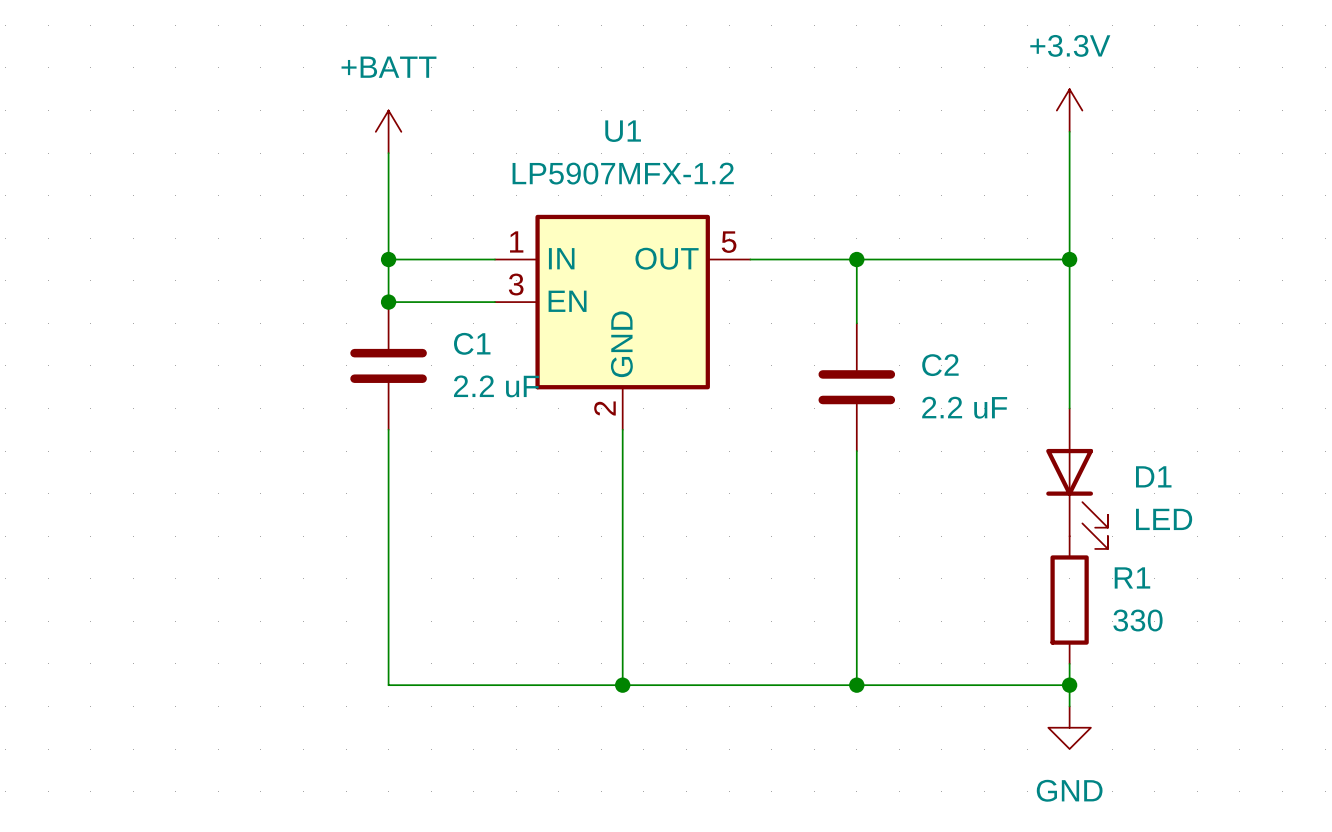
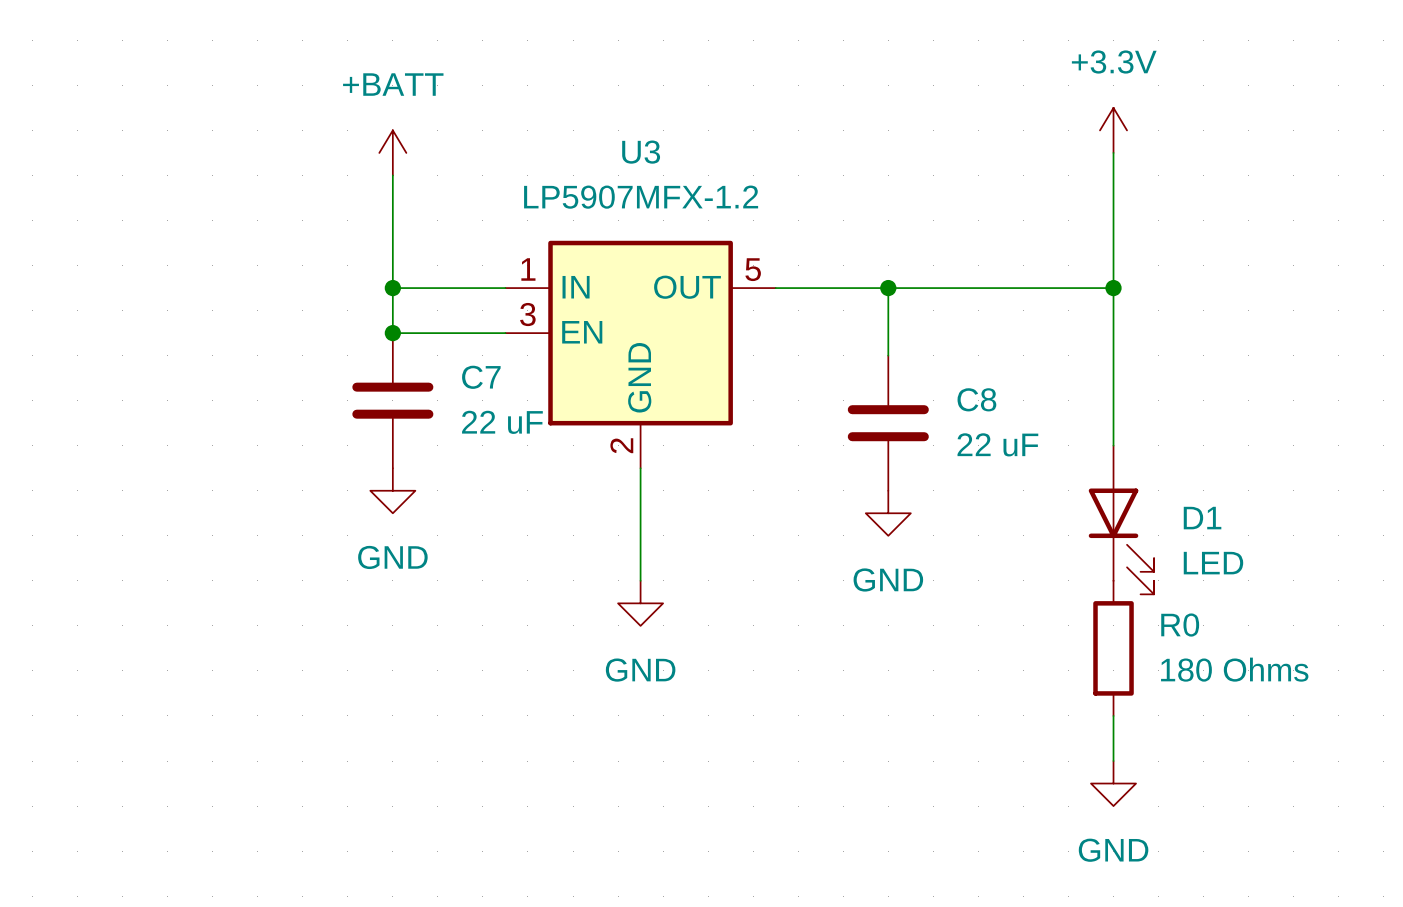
U1 name: U1 (623, 131) -> U3 (641, 152)
C1 name: C1 (472, 343) -> C7 (481, 377)
C2 name: C2 (940, 365) -> C8 (976, 399)
C1 value: 2.2 uF (496, 386) -> 22 uF (502, 422)
C2 value: 2.2 uF (964, 407) -> 22 uF (997, 444)
wire: (388, 429) (388, 685) (1069, 685) -> none
power symbol: none -> GND (392, 490)
wire: (856, 451) (856, 685) -> none
power symbol: none -> GND (888, 513)
wire: (622, 536) (622, 685) -> none
power symbol: none -> GND (640, 603)
R1 name: R1 (1132, 577) -> R0 (1180, 625)
R1 value: 330 (1137, 620) -> 180 Ohms (1234, 669)
junction: (622, 685) -> none
junction: (856, 685) -> none
junction: (1069, 685) -> none

